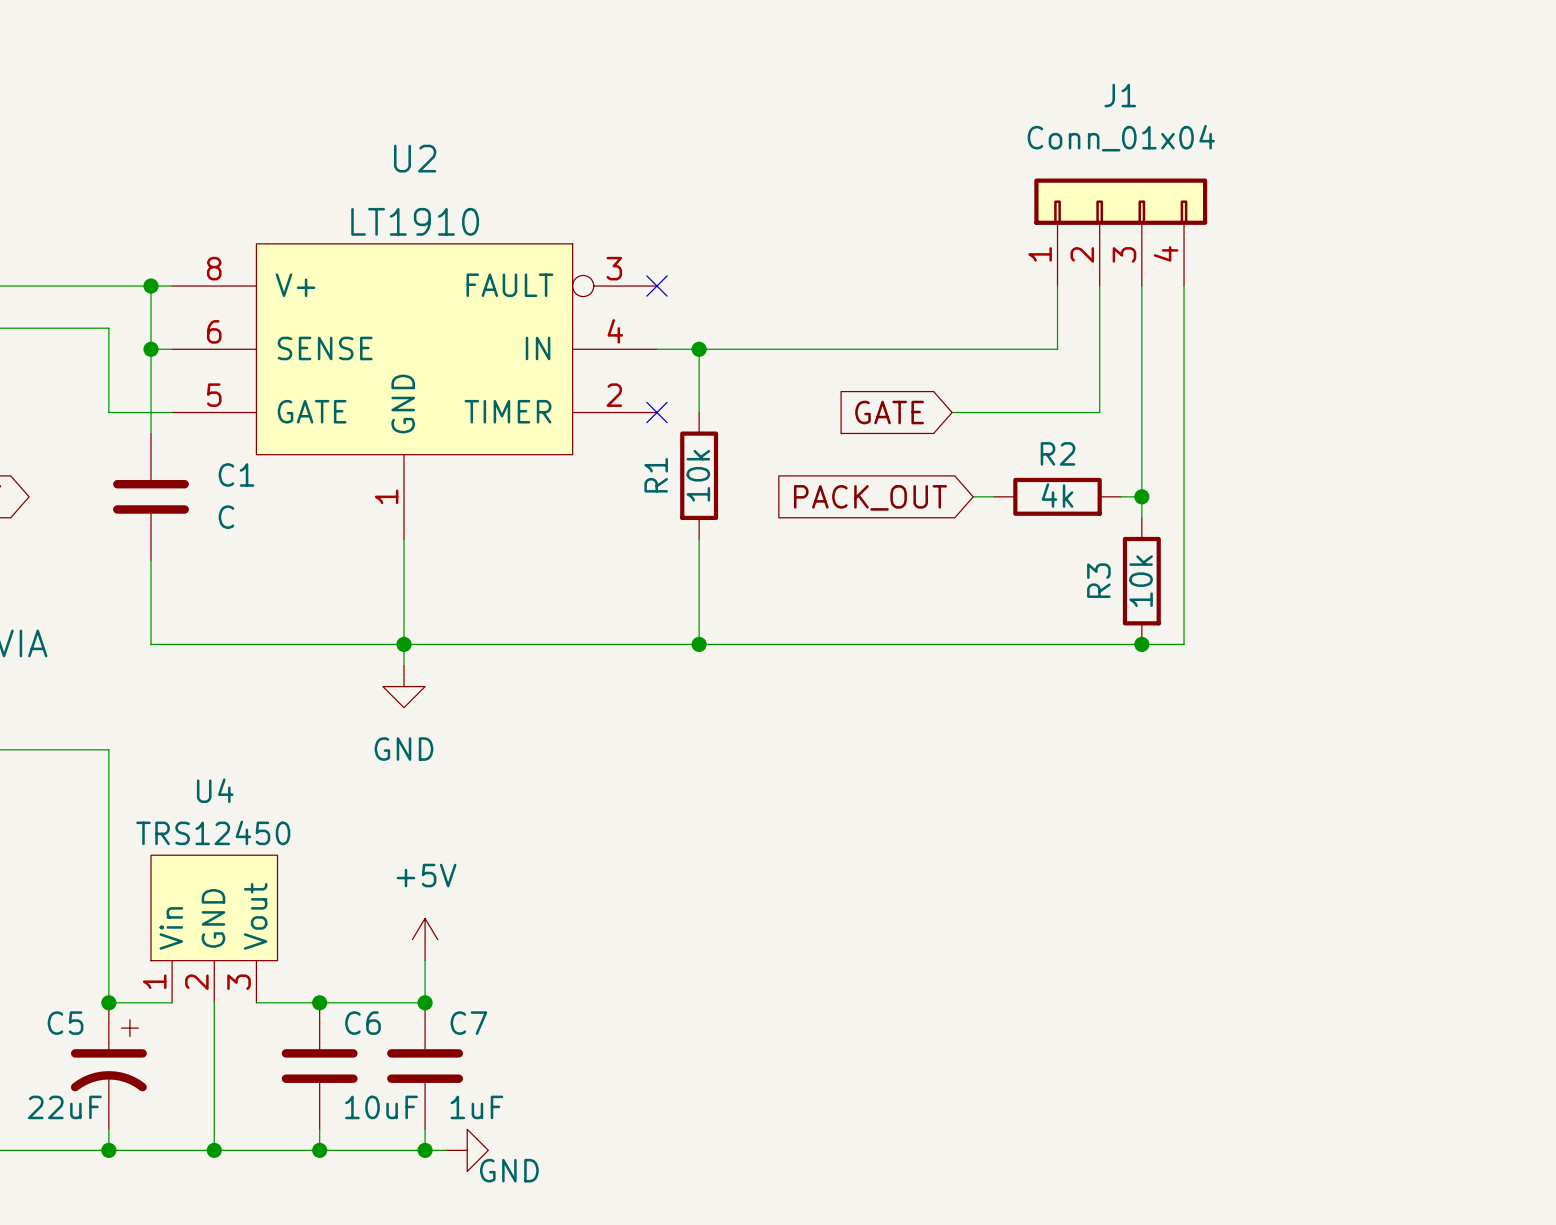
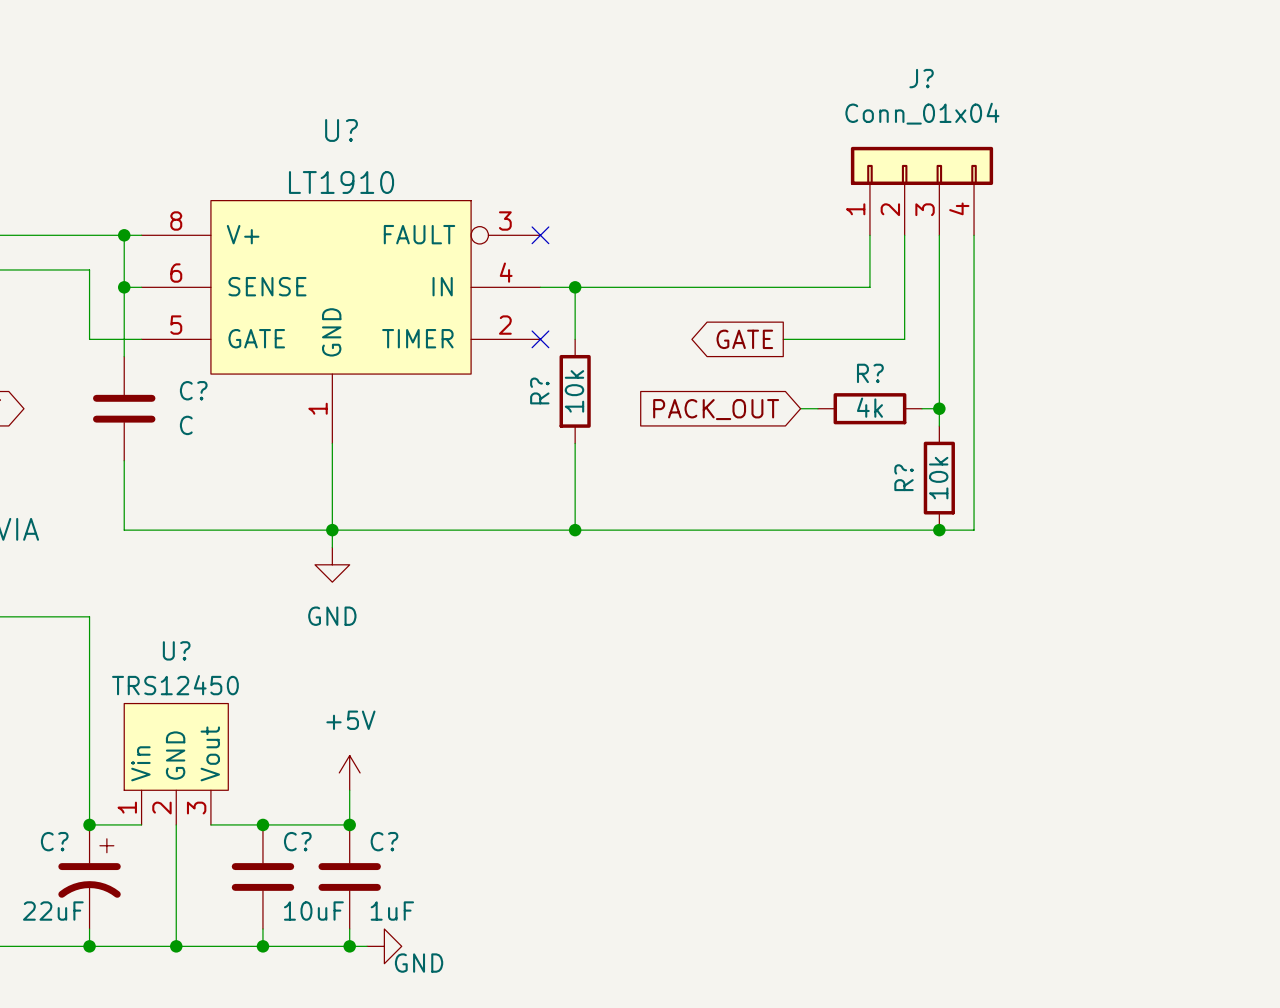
J1 name: J1 (1120, 95) -> J? (921, 78)
U2 name: U2 (415, 158) -> U? (341, 130)
global label shape: input (889, 412) -> output (744, 339)
R2 name: R2 (1058, 453) -> R? (870, 373)
C1 name: C1 (236, 474) -> C? (193, 390)
R1 name: R1 (656, 475) -> R? (539, 390)
R3 name: R3 (1098, 580) -> R? (904, 477)
U4 name: U4 (215, 790) -> U? (176, 650)
C5 name: C5 (65, 1023) -> C? (54, 841)
C6 name: C6 (362, 1023) -> C? (297, 841)
C7 name: C7 (468, 1023) -> C? (384, 841)

